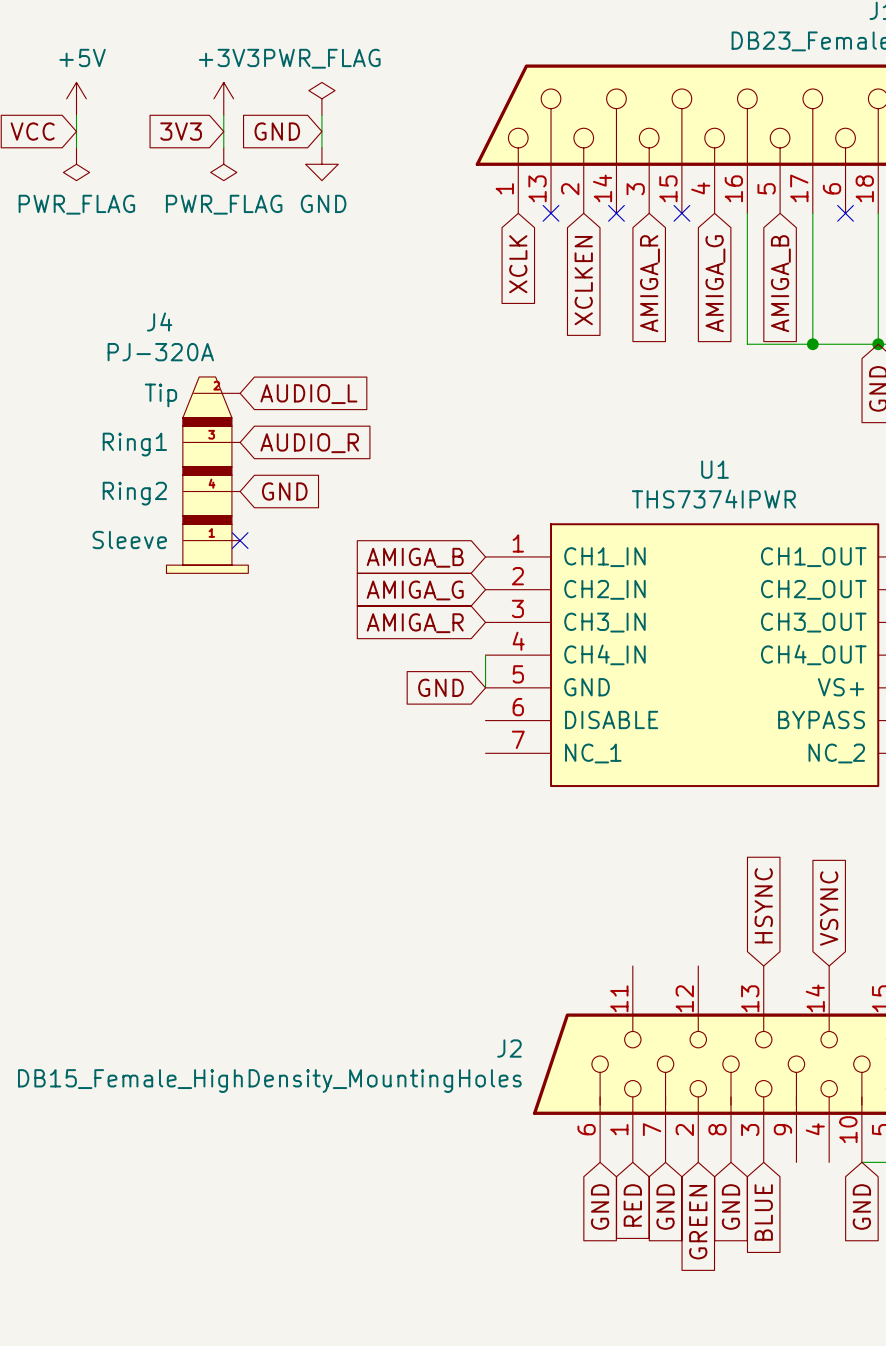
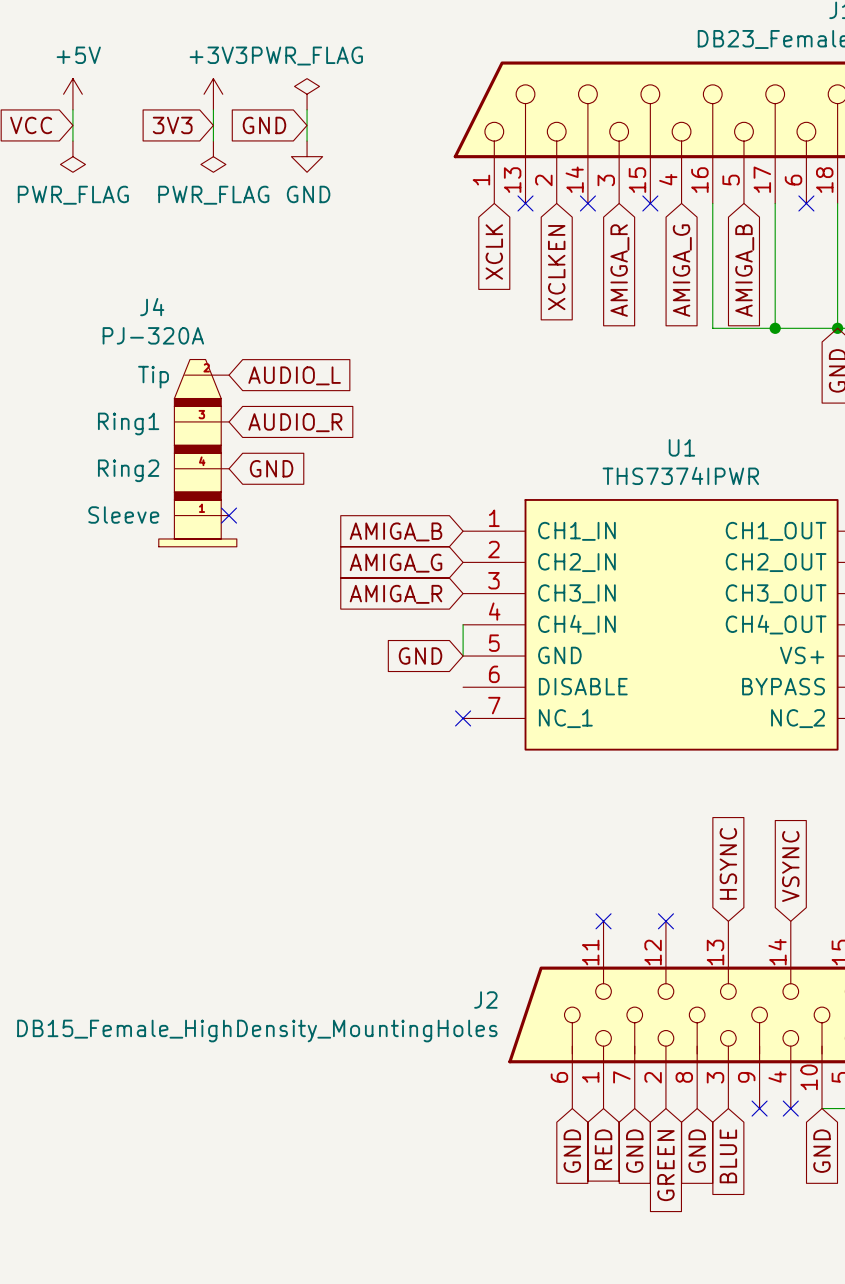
no-connect mark: none -> (463, 718)
no-connect mark: none -> (603, 921)
no-connect mark: none -> (665, 921)
no-connect mark: none -> (759, 1108)
no-connect mark: none -> (790, 1108)

